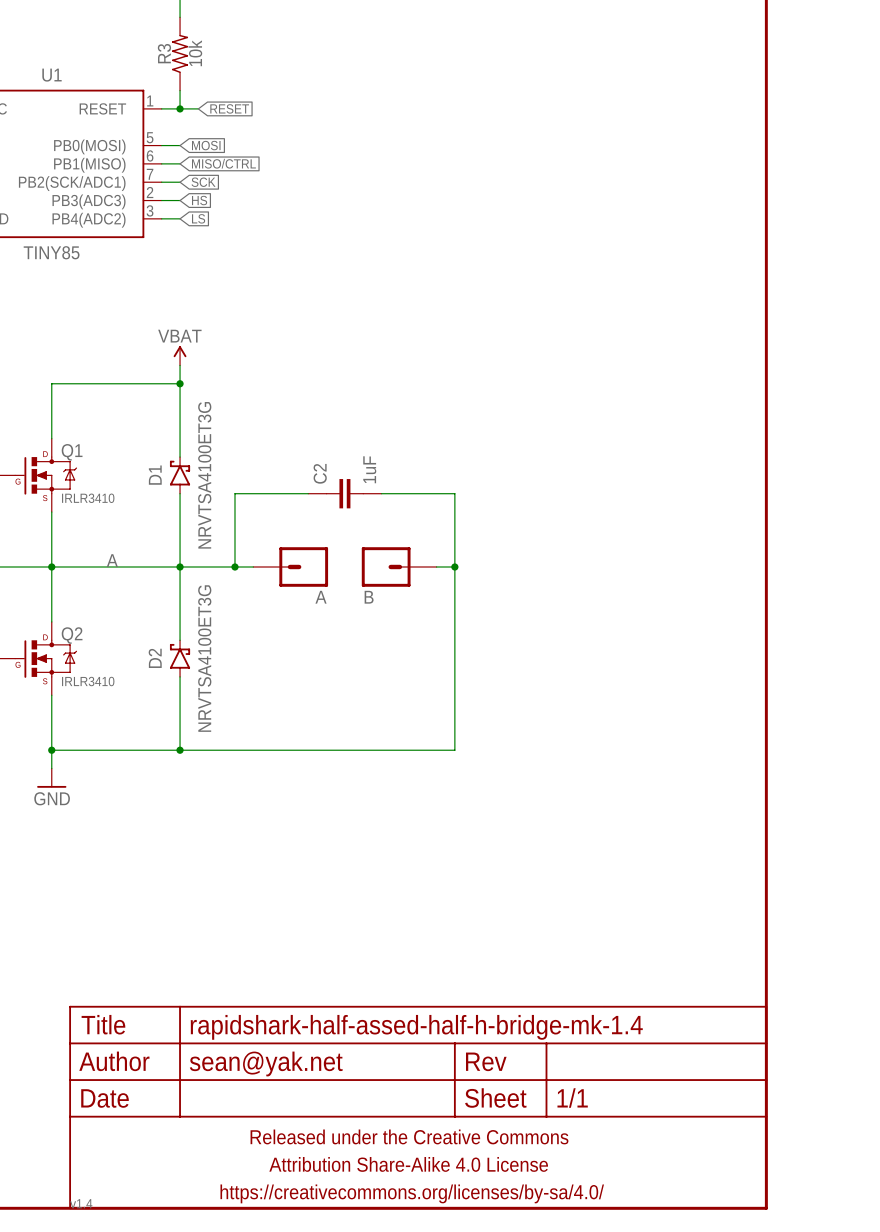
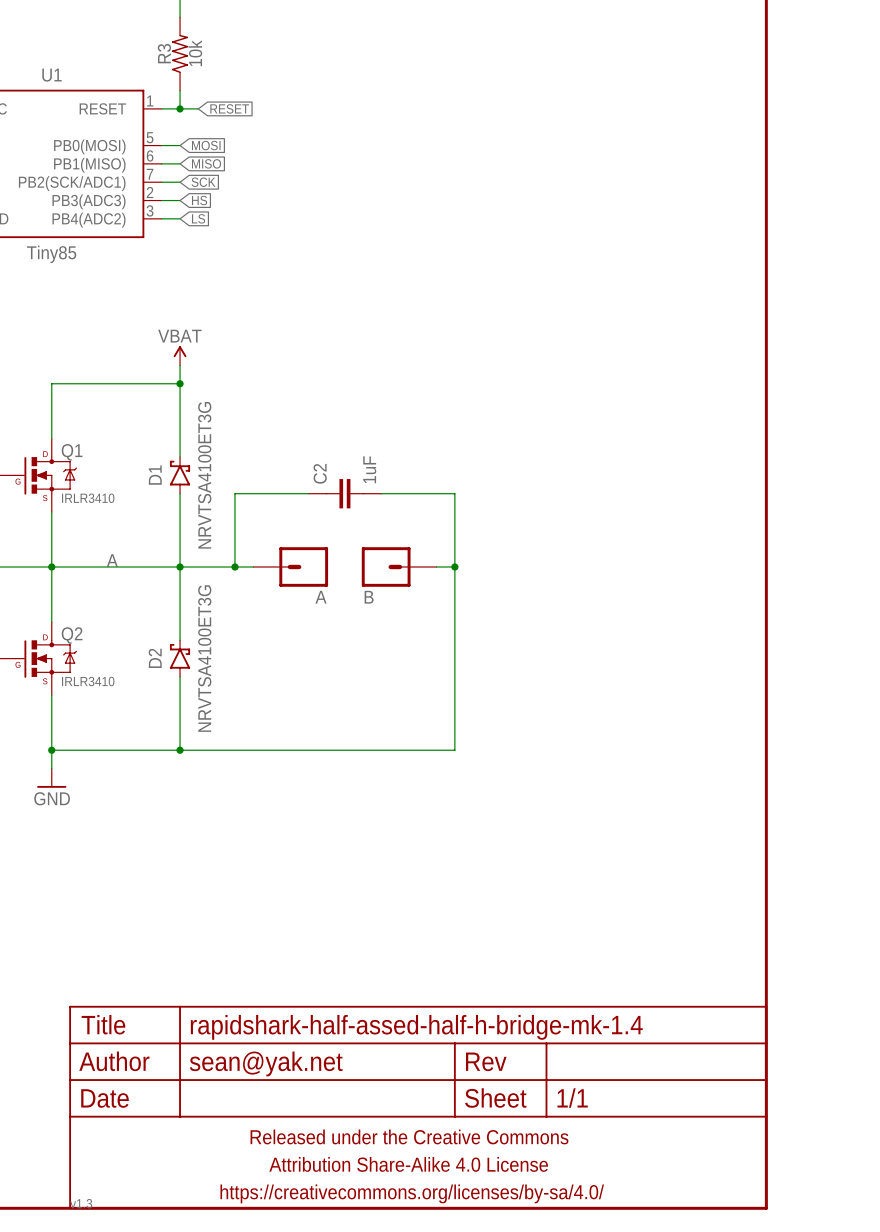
global label: MISO/CTRL (223, 163) -> MISO (206, 163)
U1 value: TINY85 (51, 252) -> Tiny85 (51, 254)
part text: v1.4 (81, 1203) -> v1.3 (81, 1203)

